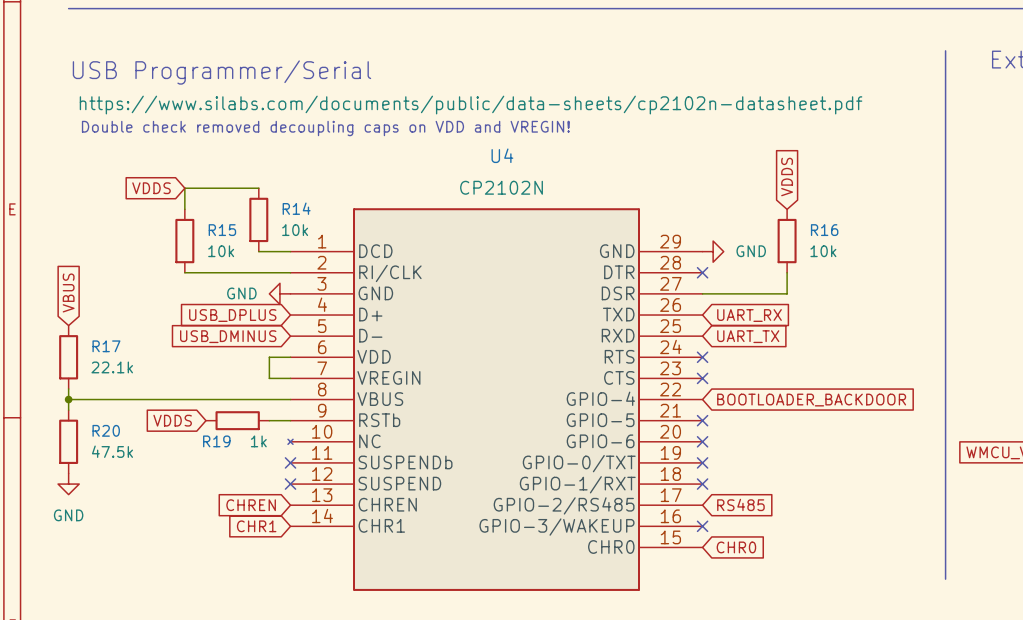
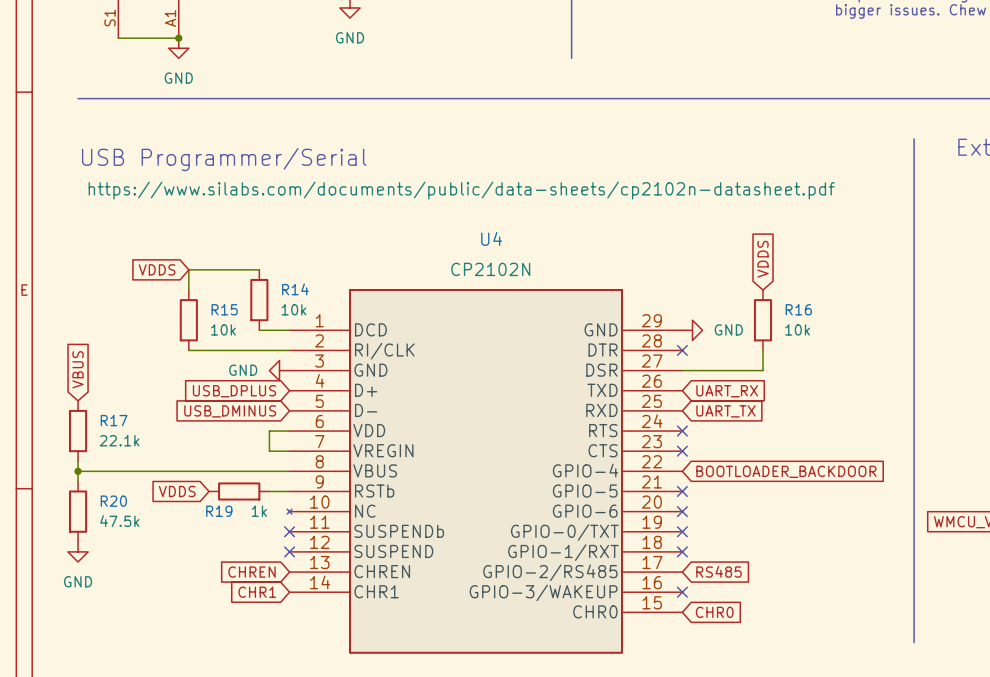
text: Double check removed decoupling caps on VDD and VREGIN! (325, 128) -> none

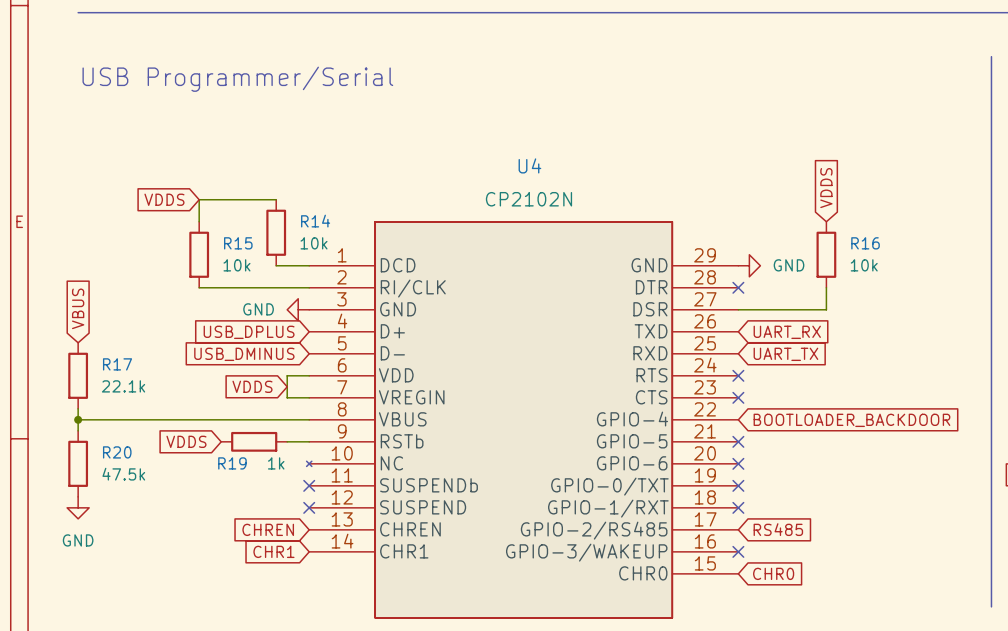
U4 text: https://www.silabs.com/documents/public/data-sheets/cp2102n-datasheet.pdf (461, 190) -> none
global label: none -> VDDS (252, 386)

